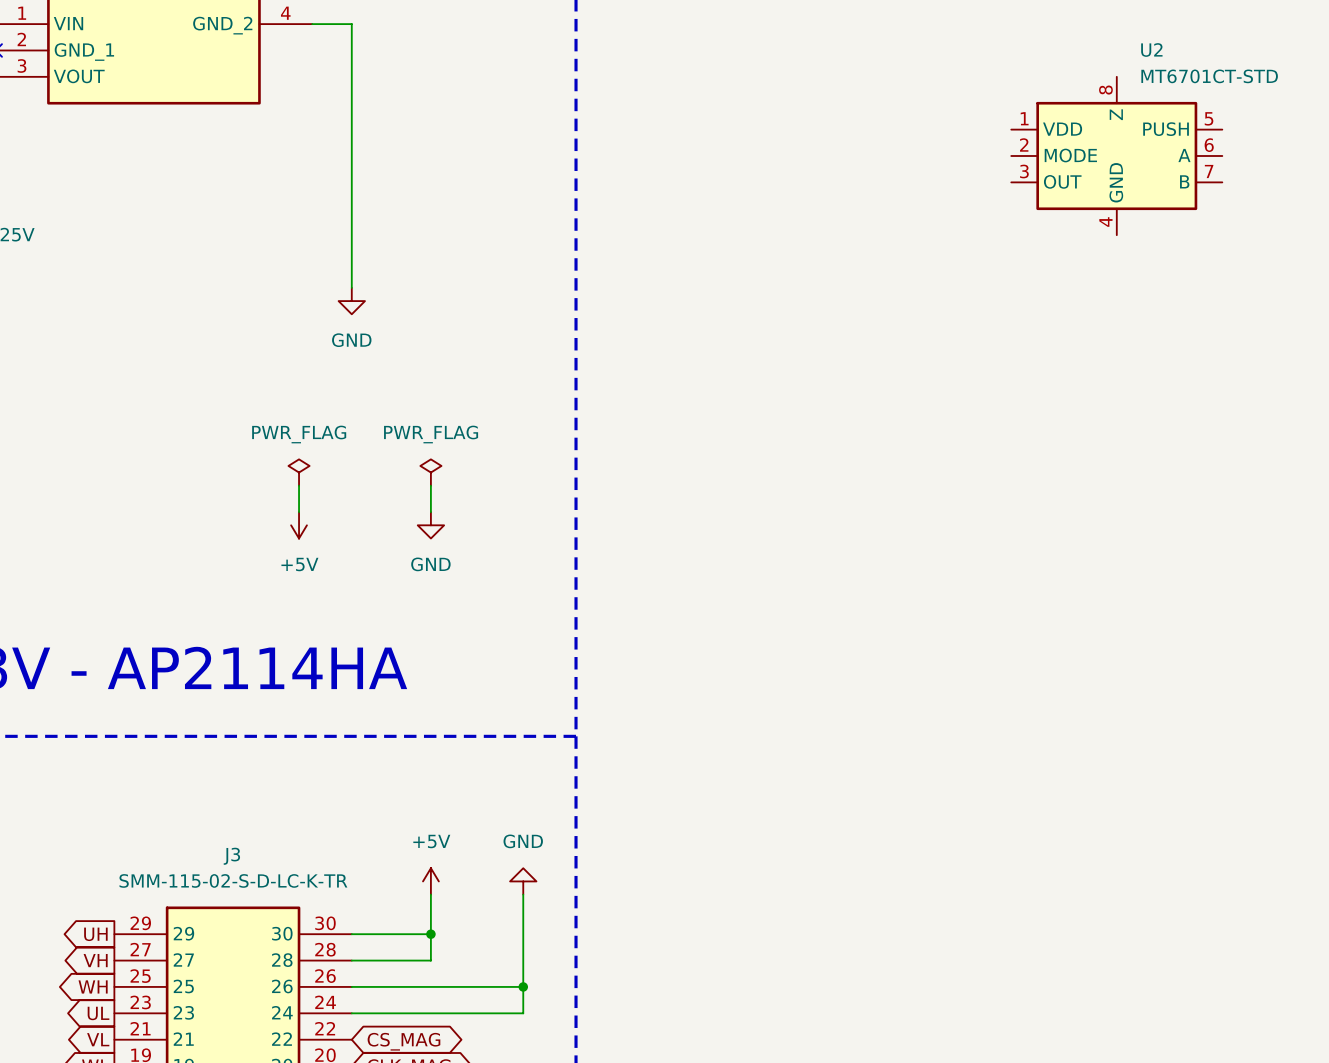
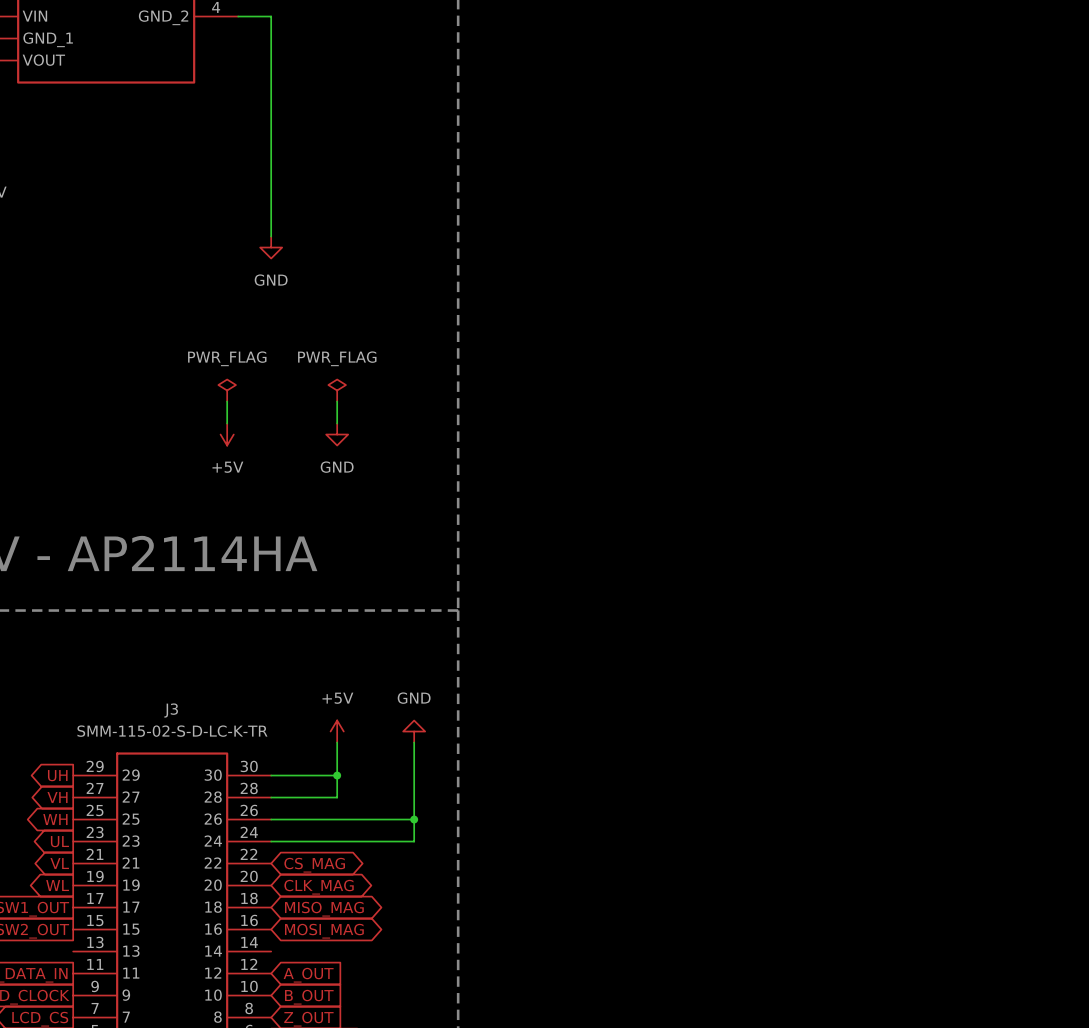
U2: MT6701CT-STD (1116, 155) -> none

